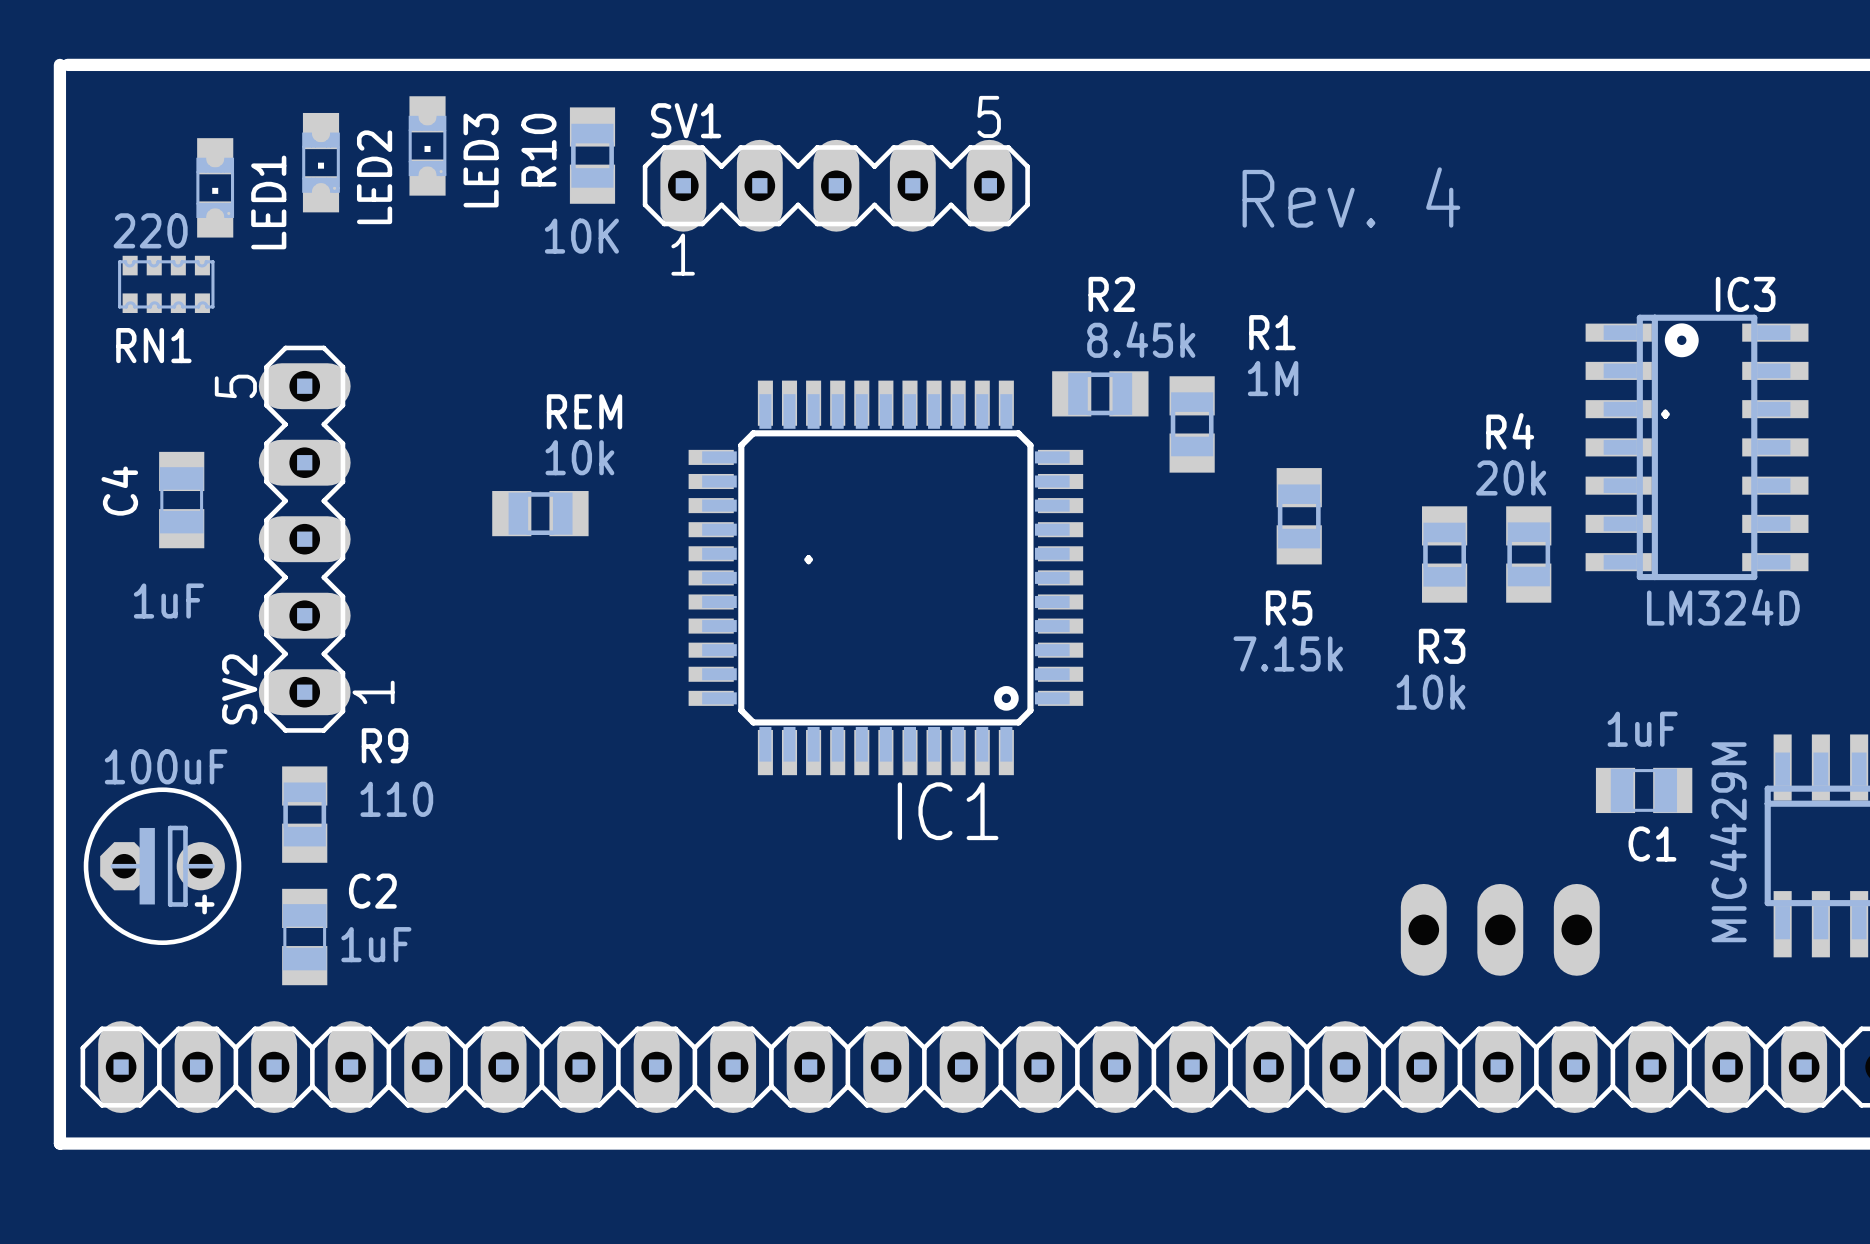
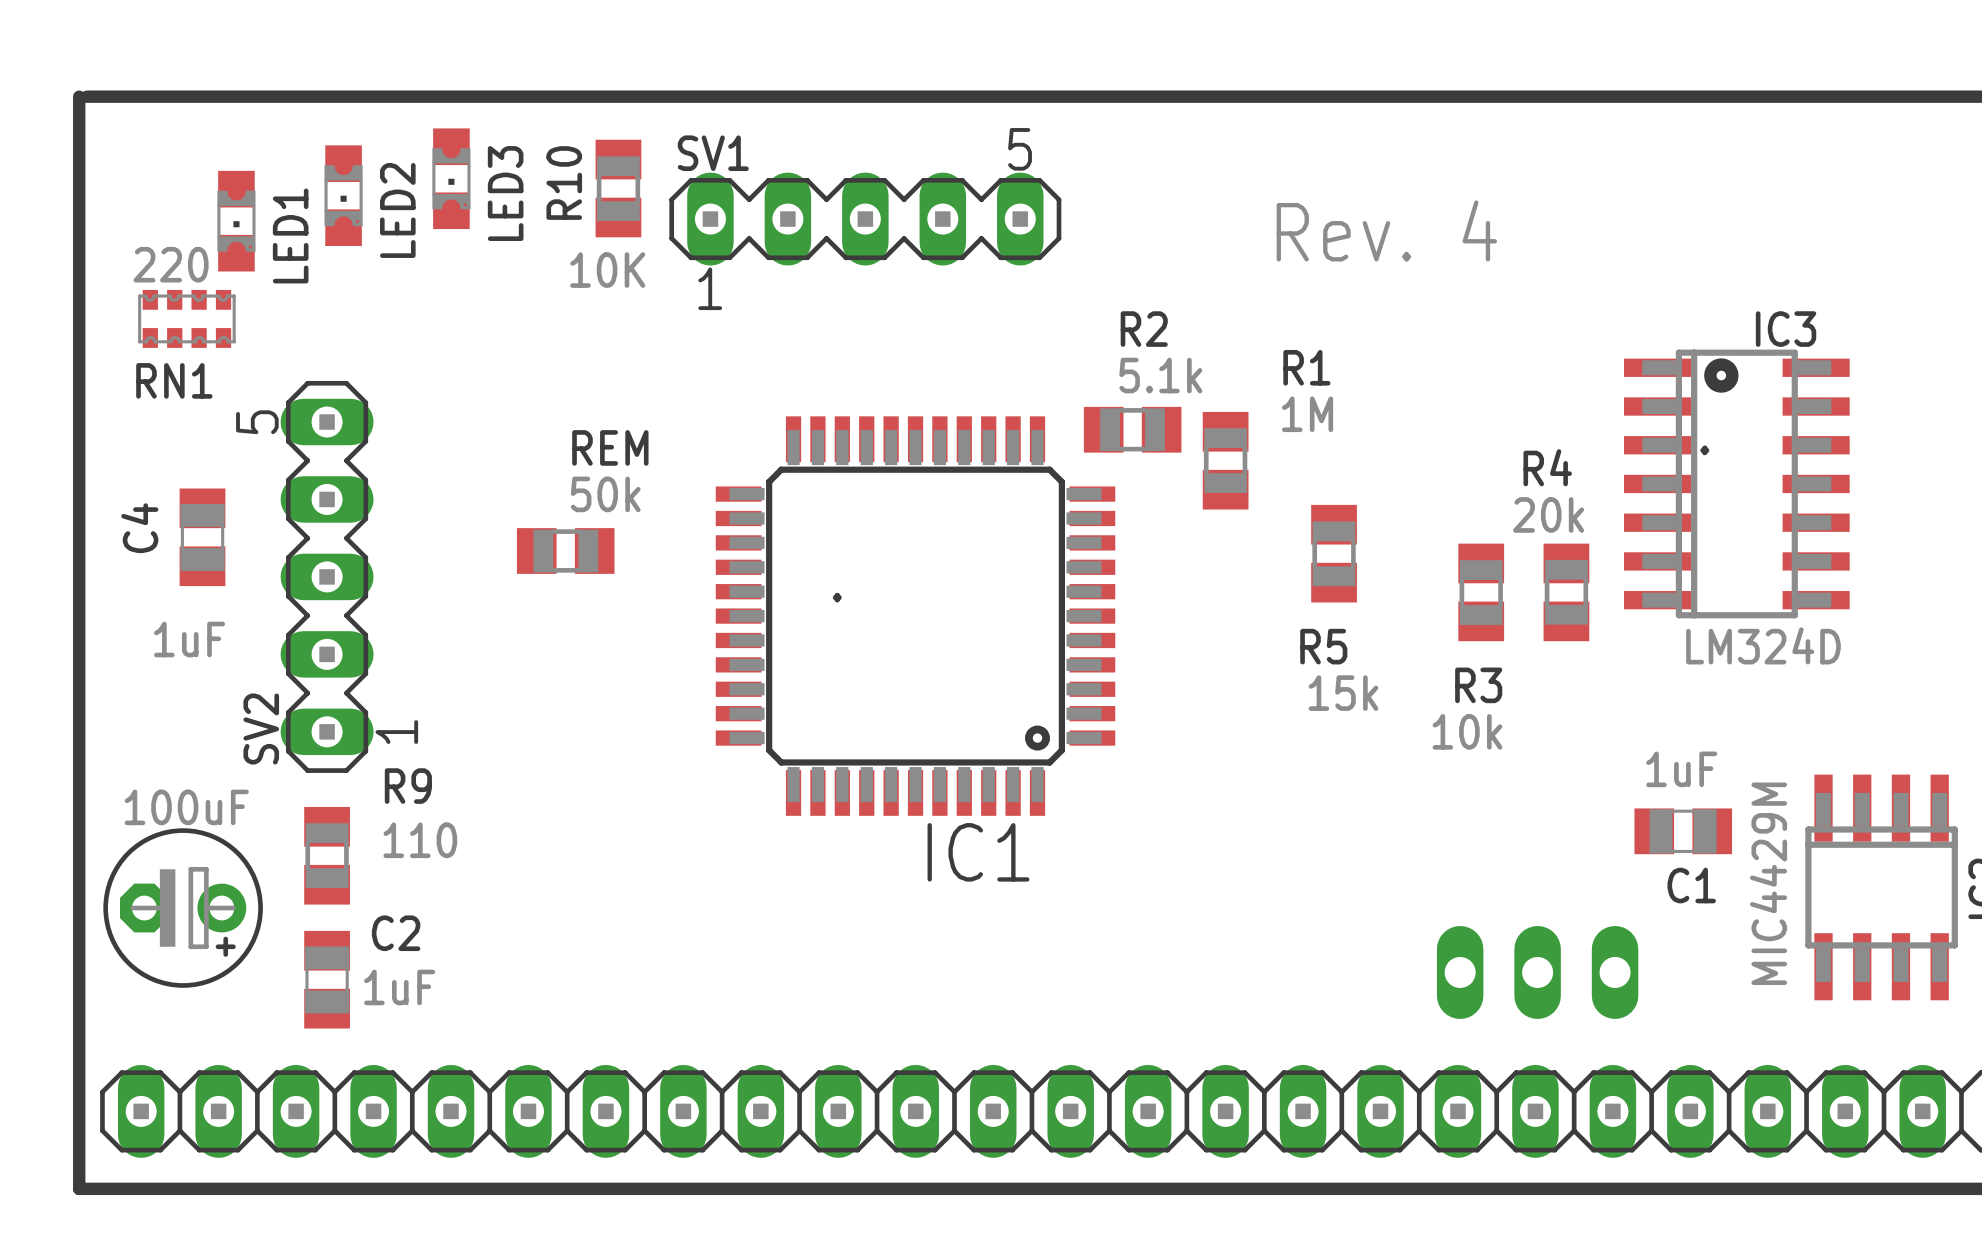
R2 value: 8.45k (1141, 339) -> 5.1k (1160, 375)
REM value: 10k (579, 457) -> 50k (605, 494)
R5 value: 7.15k (1288, 653) -> 15k (1343, 693)

